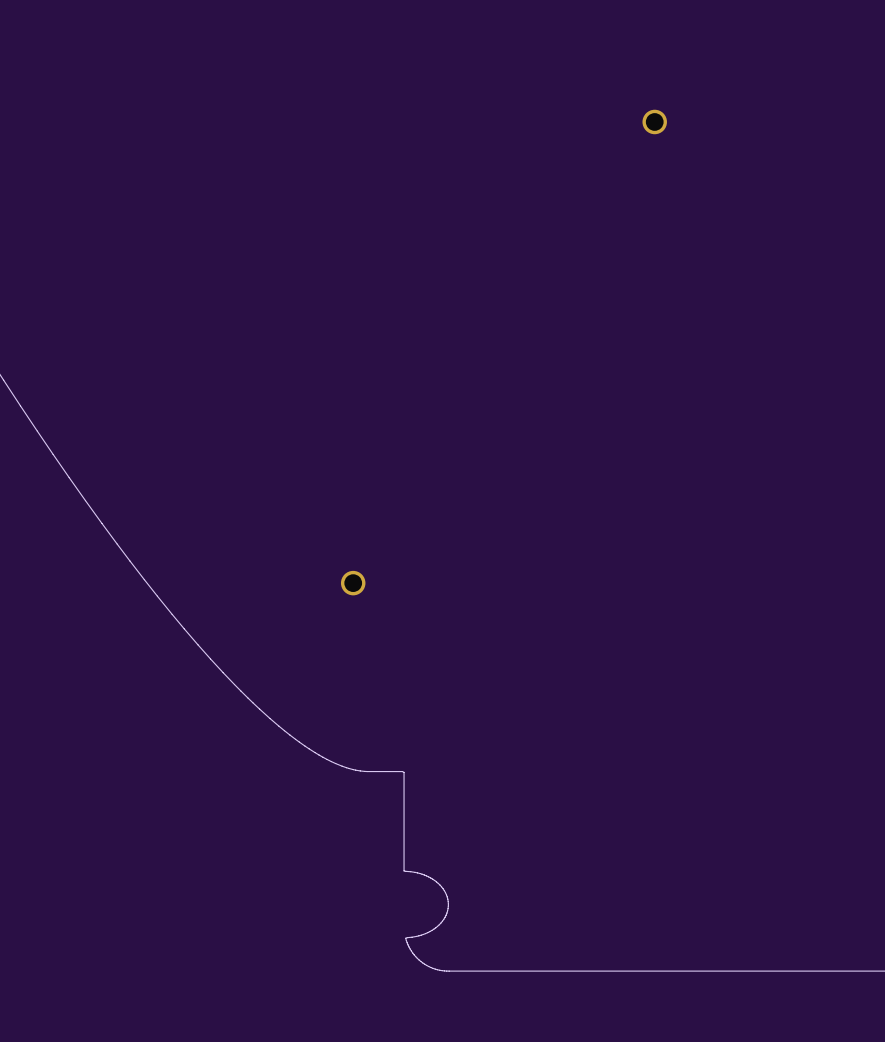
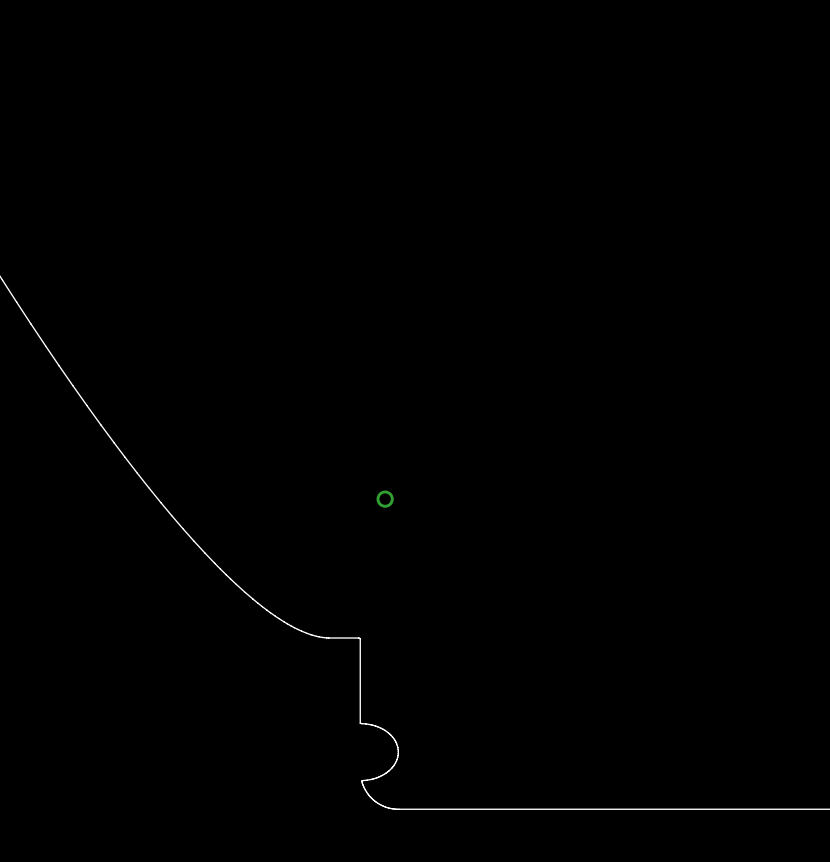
via: (654, 121) -> none
via: (353, 583) -> none
via: none -> (385, 499)

